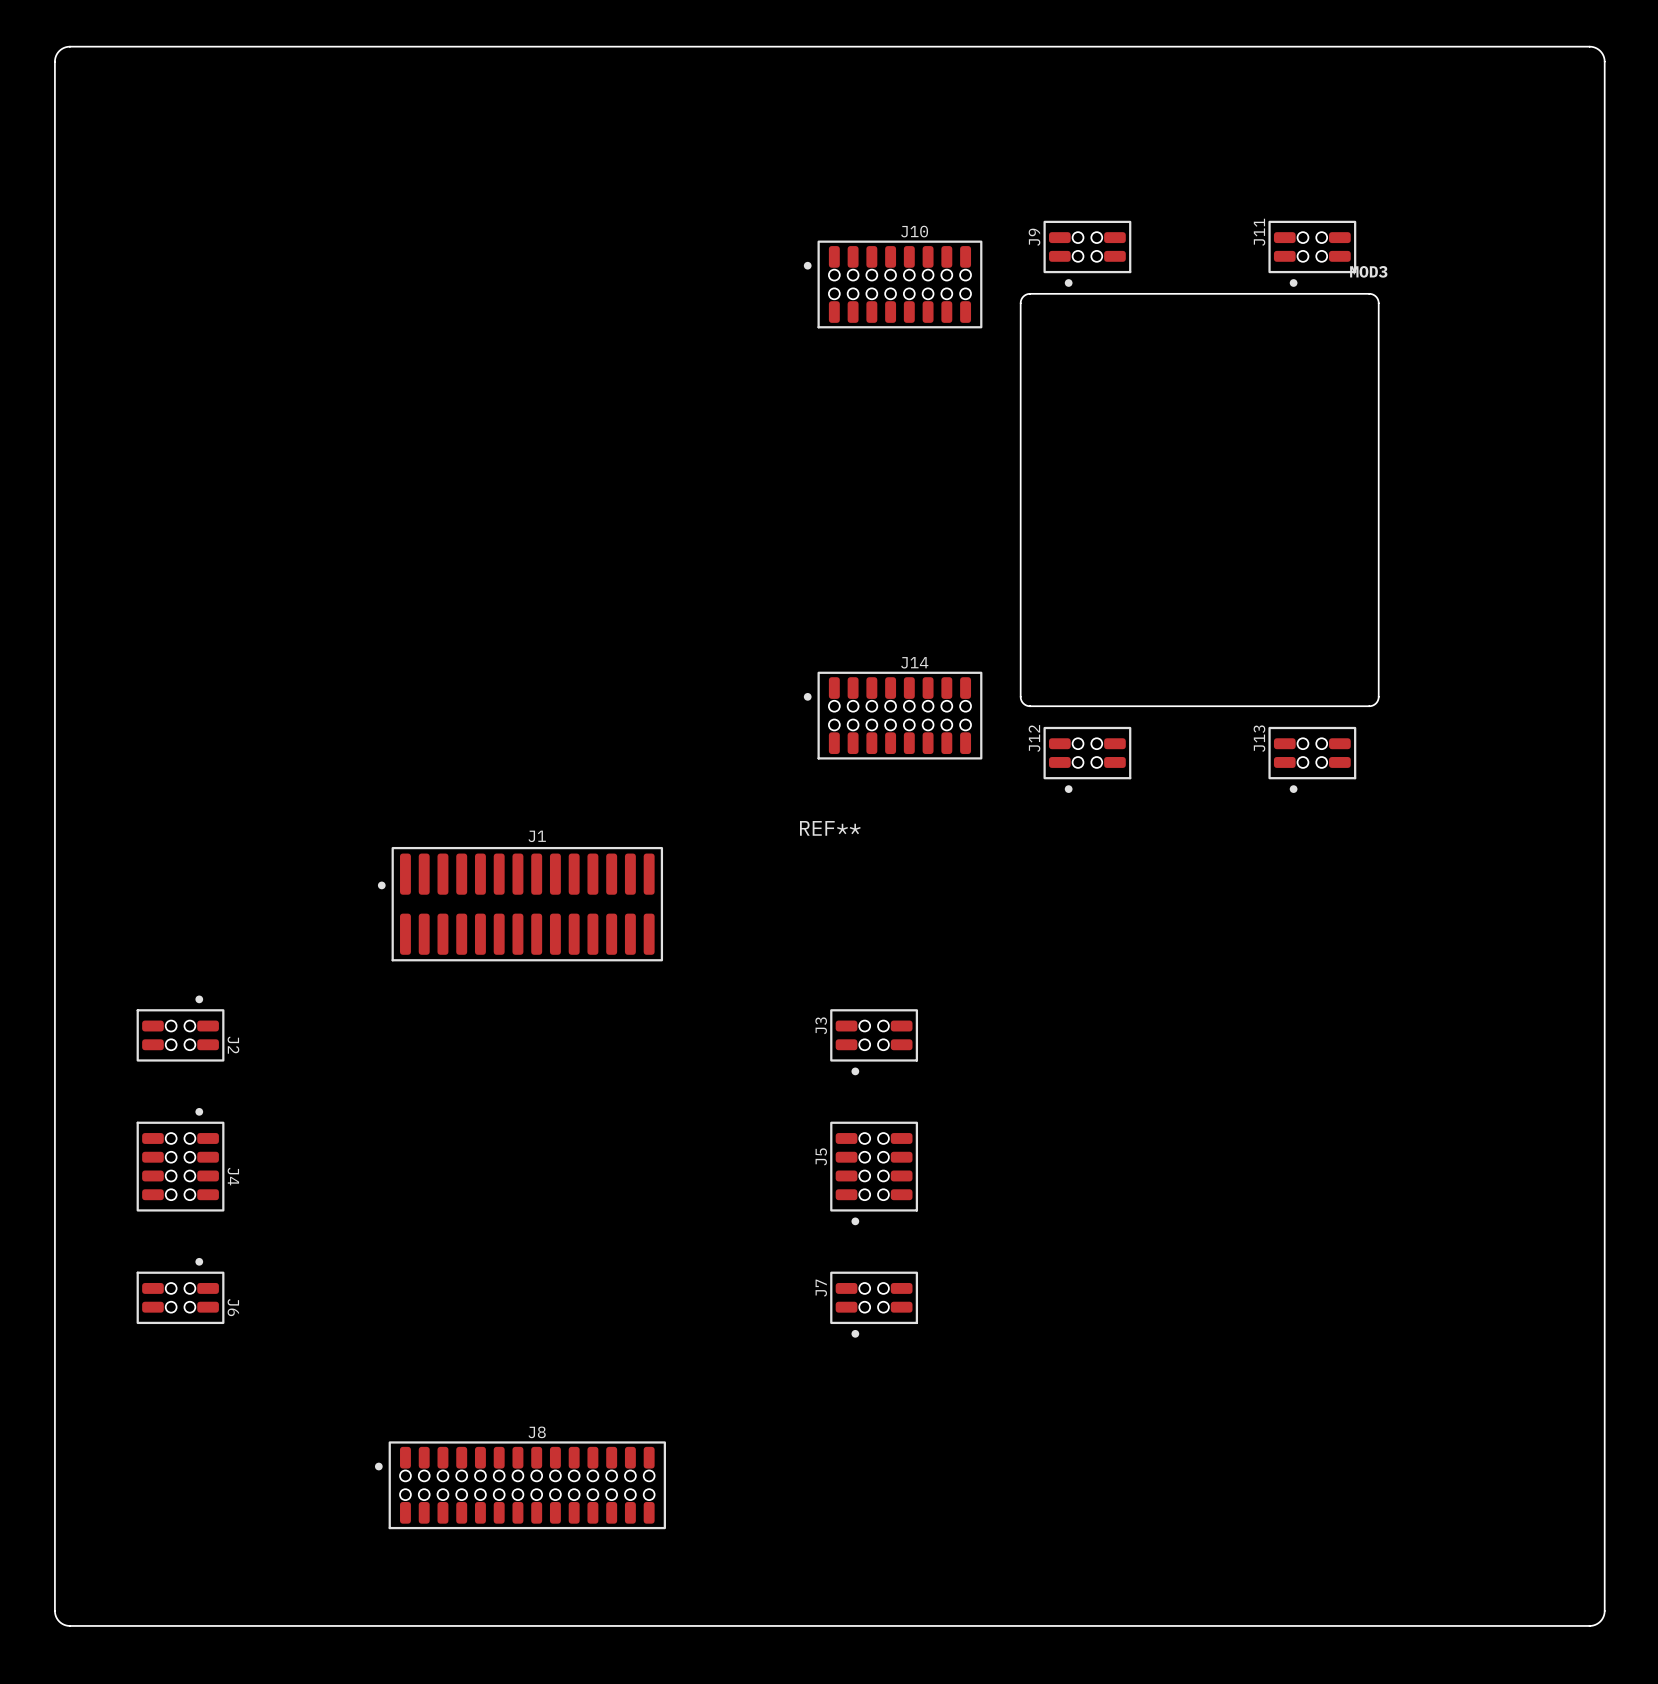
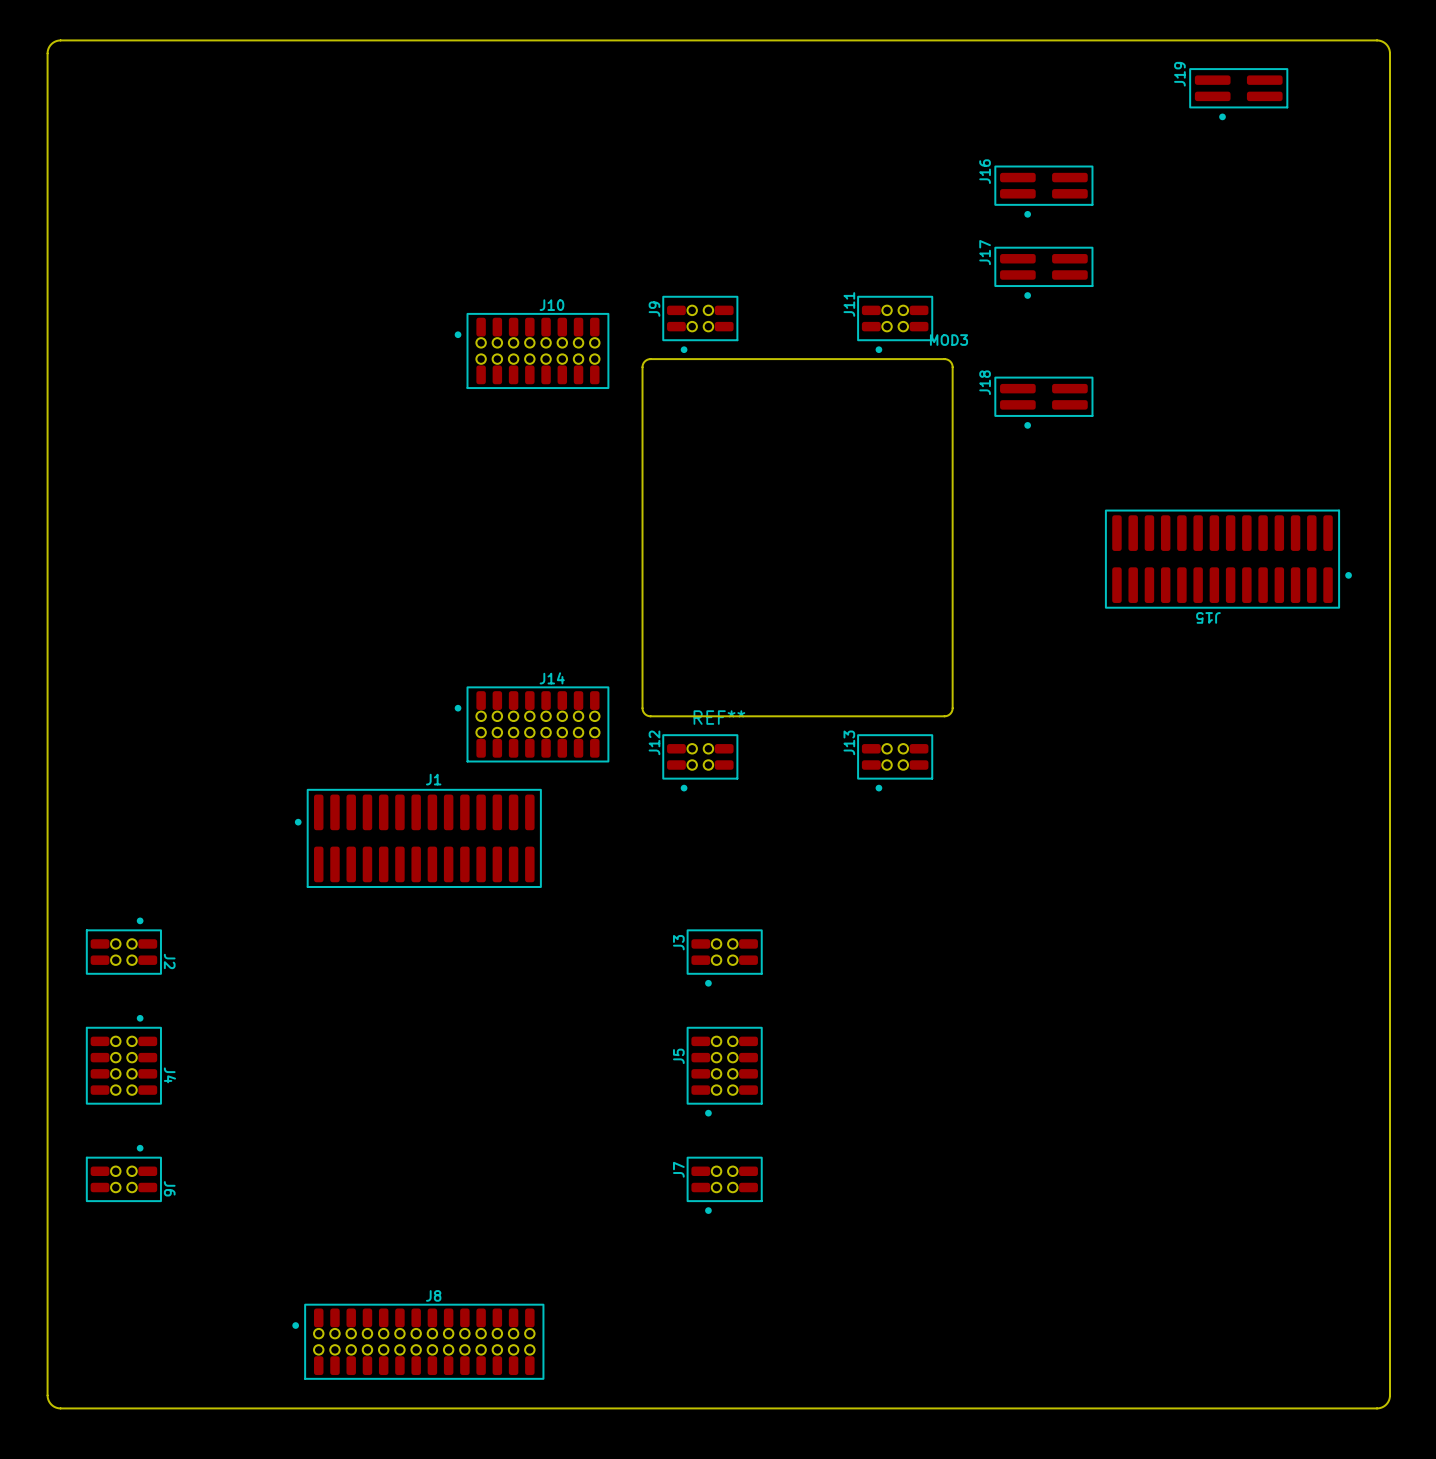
J19: none -> (1238, 94)
J16: none -> (1043, 191)
J9 position: (1087, 253) -> (700, 324)
J11 position: (1312, 253) -> (895, 324)
J10 position: (893, 284) -> (532, 350)
J17: none -> (1043, 272)
J18: none -> (1043, 402)
MOD3 position: (1199, 500) -> (797, 537)
J15: none -> (1228, 559)
J14 position: (893, 715) -> (532, 724)
J12 position: (1087, 759) -> (700, 762)
J13 position: (1312, 759) -> (895, 762)
J1 position: (520, 904) -> (418, 838)
J2 position: (180, 1028) -> (123, 946)
J3 position: (874, 1042) -> (724, 957)
J4 position: (180, 1159) -> (123, 1059)
J5 position: (874, 1173) -> (724, 1071)
J6 position: (180, 1290) -> (123, 1173)
J7 position: (874, 1304) -> (724, 1185)
J8 position: (520, 1485) -> (418, 1341)

